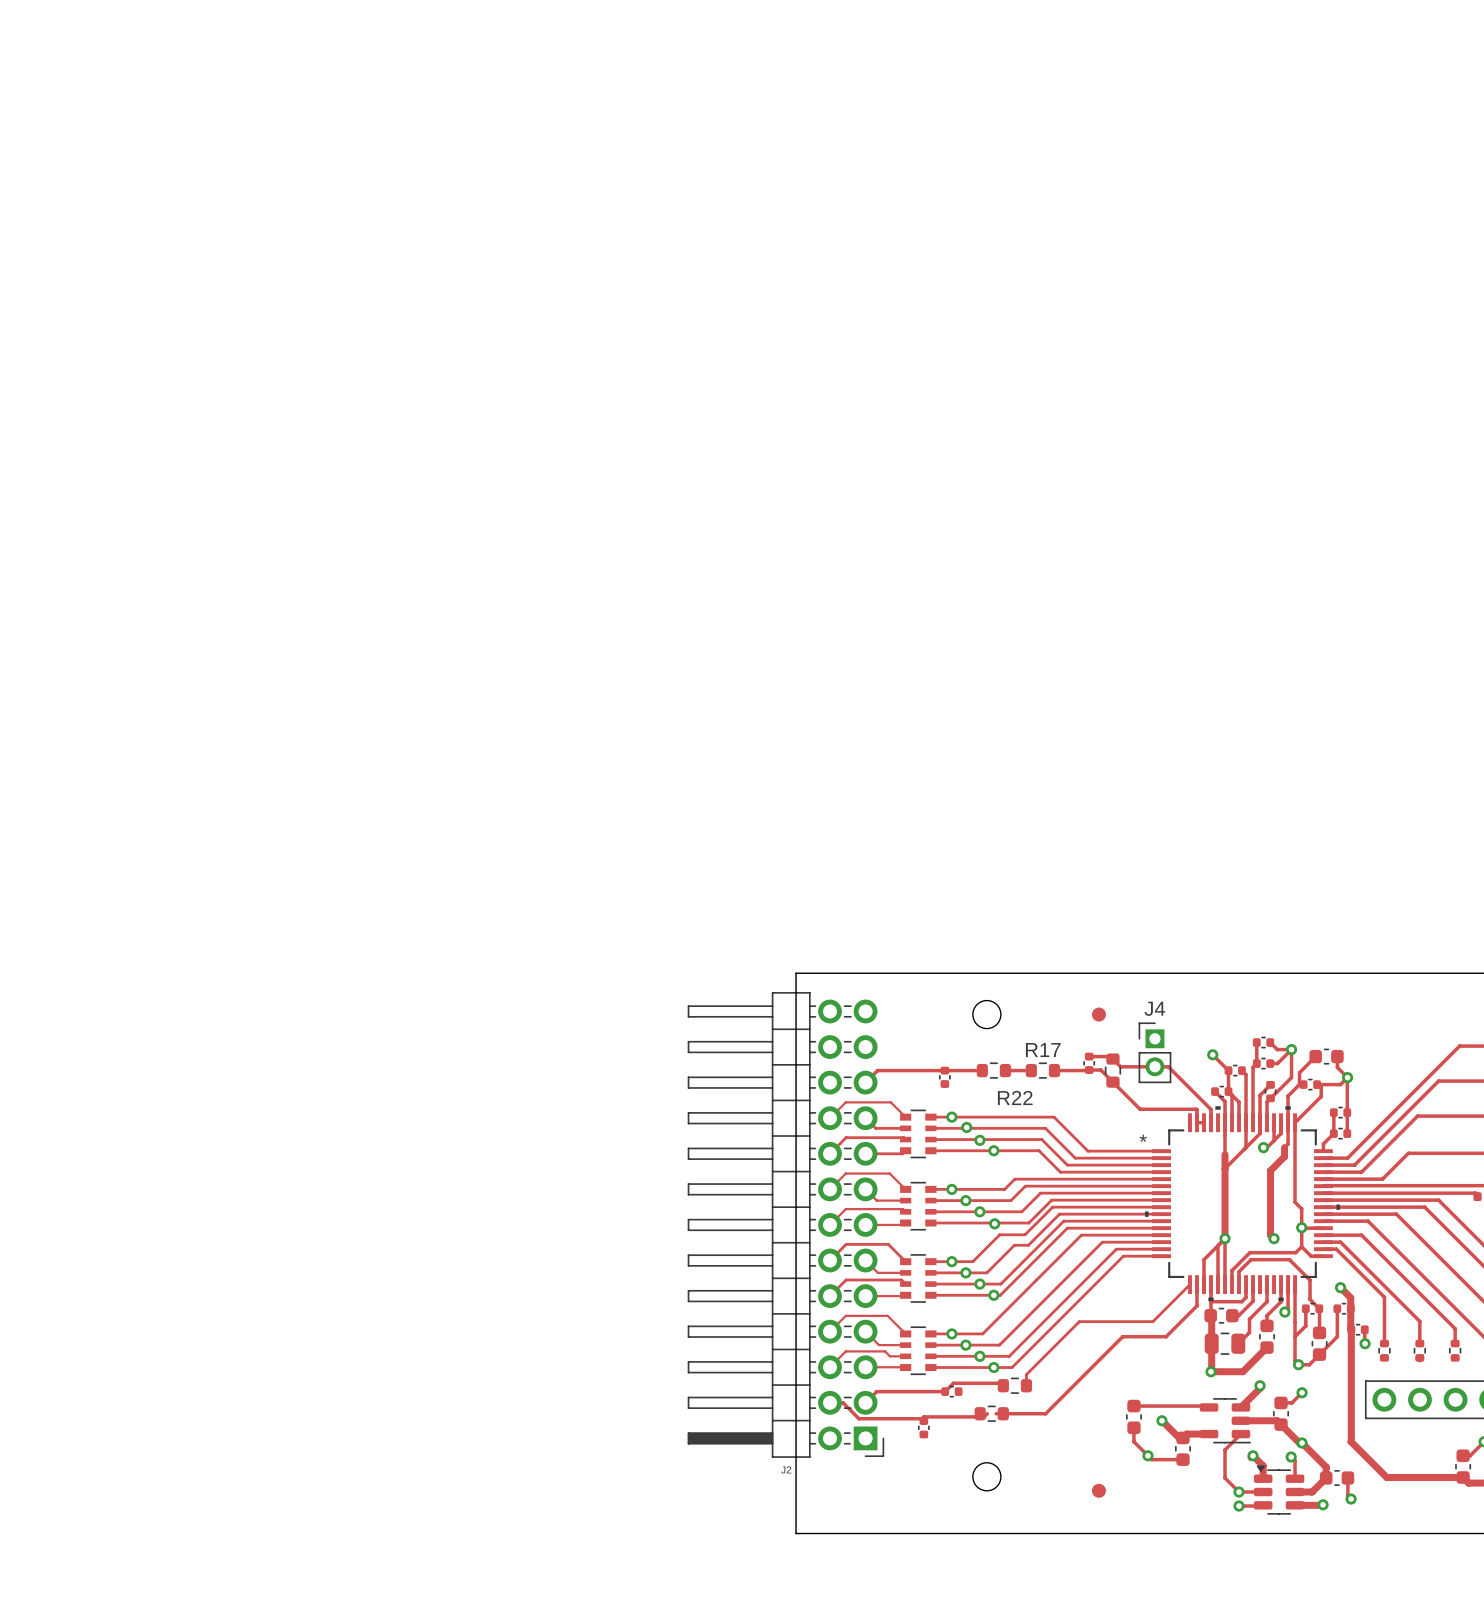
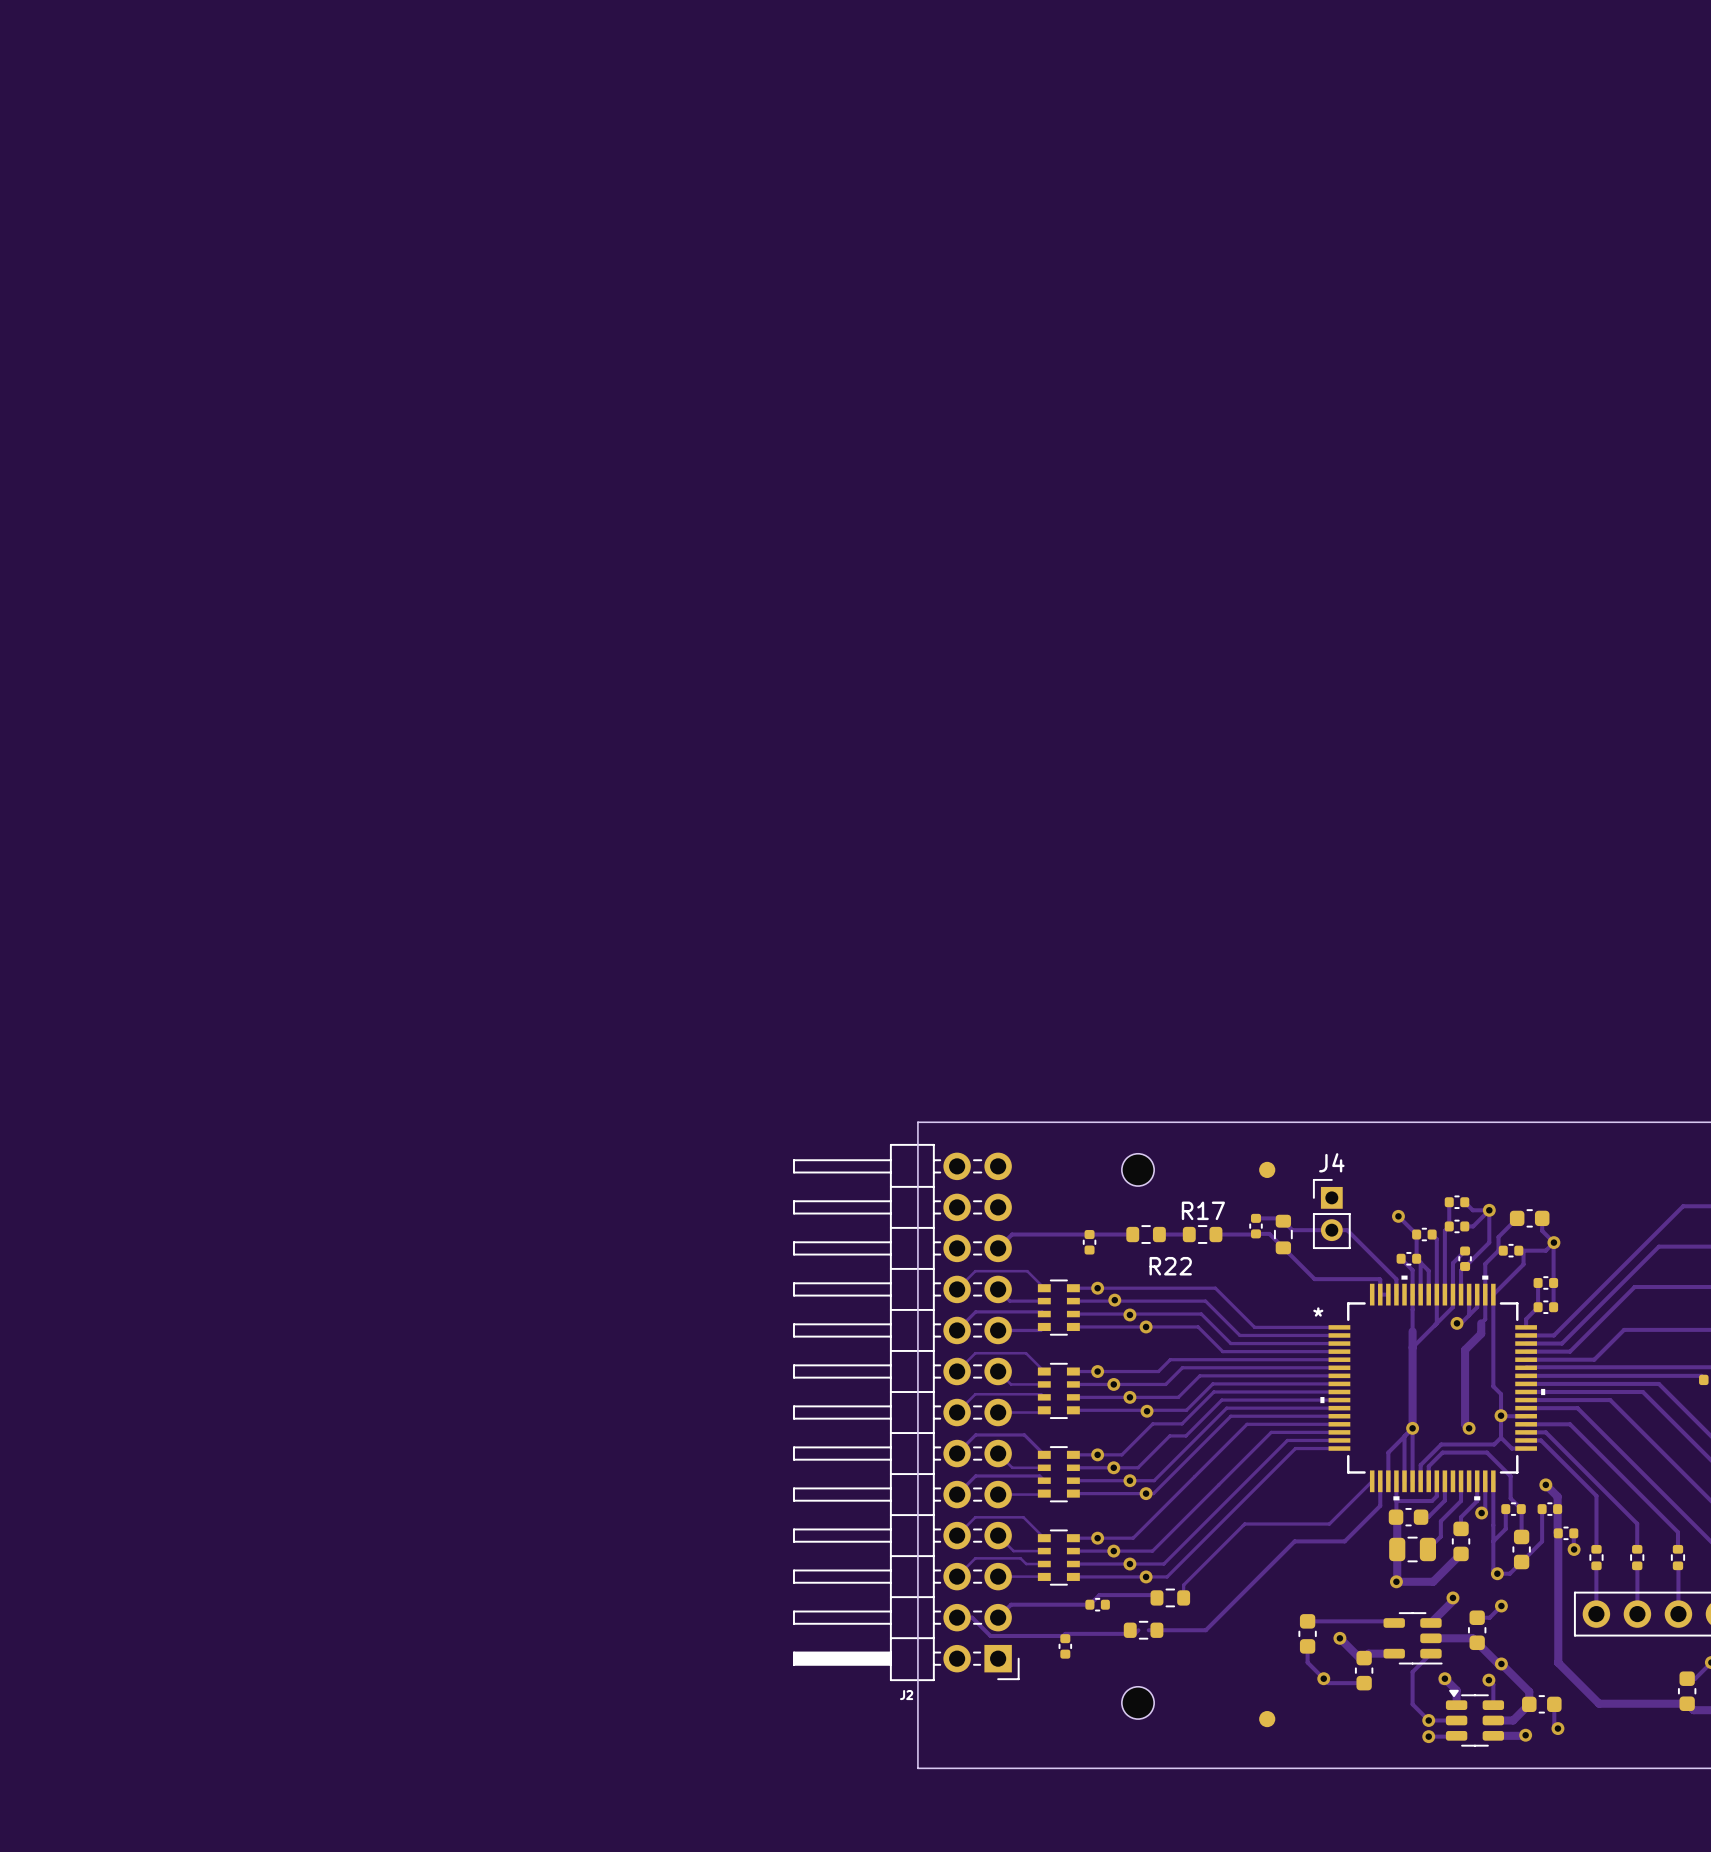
track: none -> (1596, 1565) (1596, 1614)
track: none -> (1677, 1565) (1678, 1614)
track: none -> (1637, 1565) (1637, 1614)

